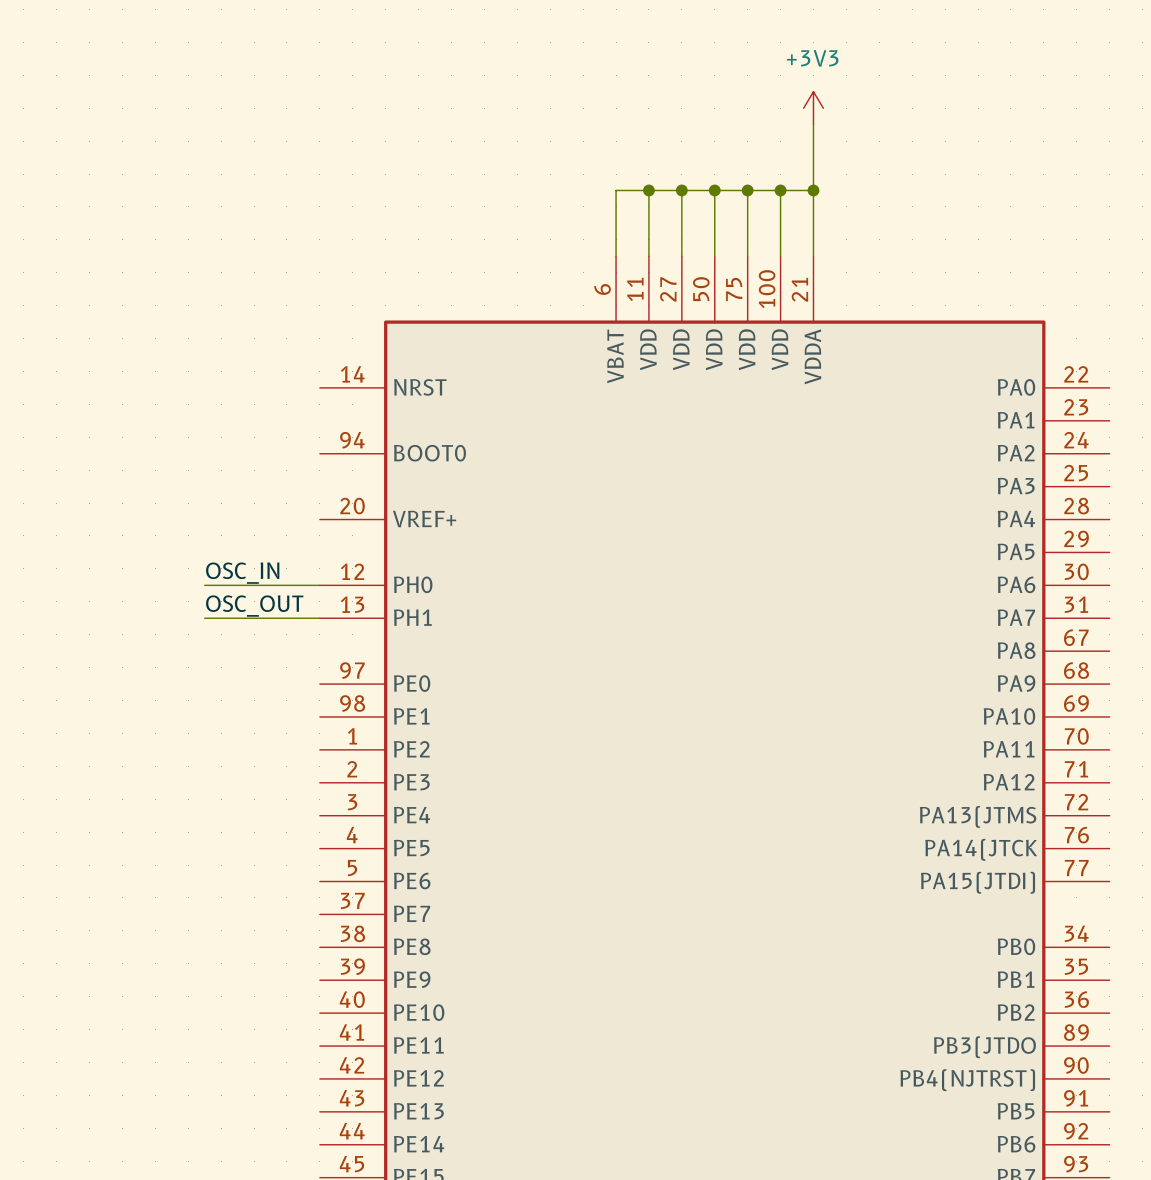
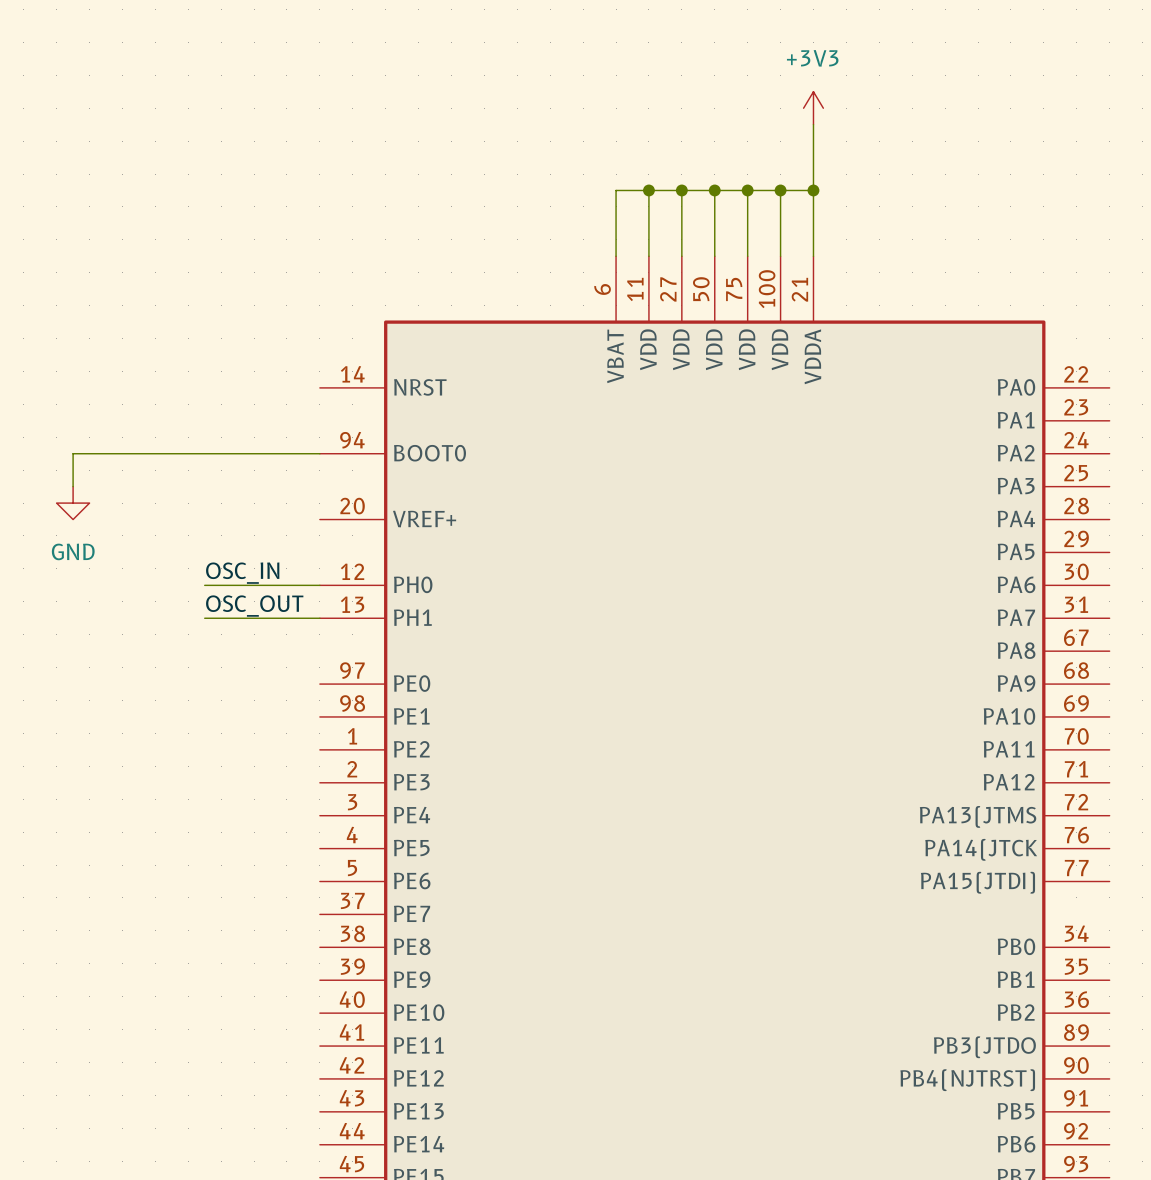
wire: none -> (319, 453) (73, 453) (73, 486)
power symbol: none -> GND (73, 503)

